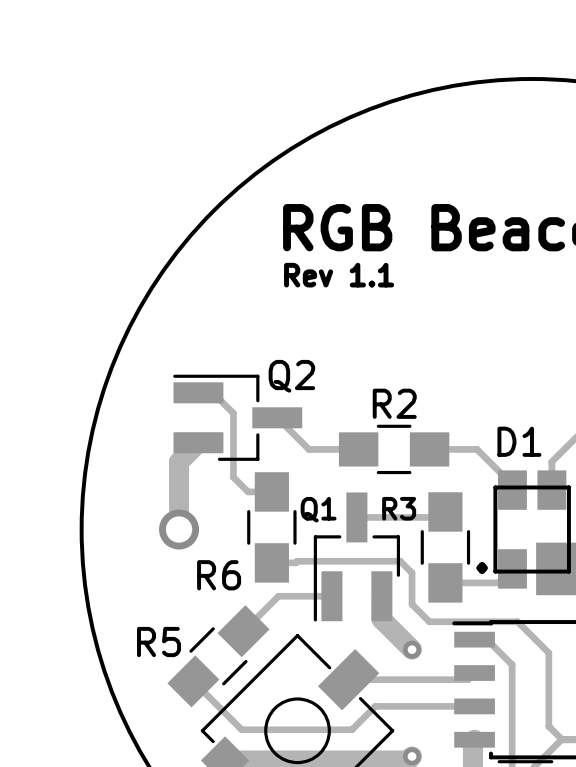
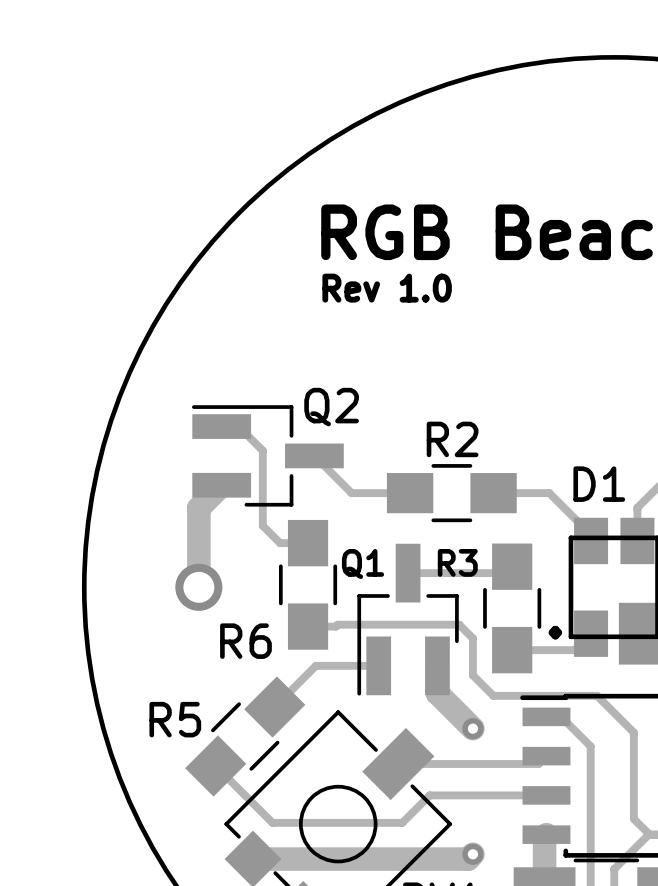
text: Rev 1.1 (339, 275) -> Rev 1.0 (387, 288)

